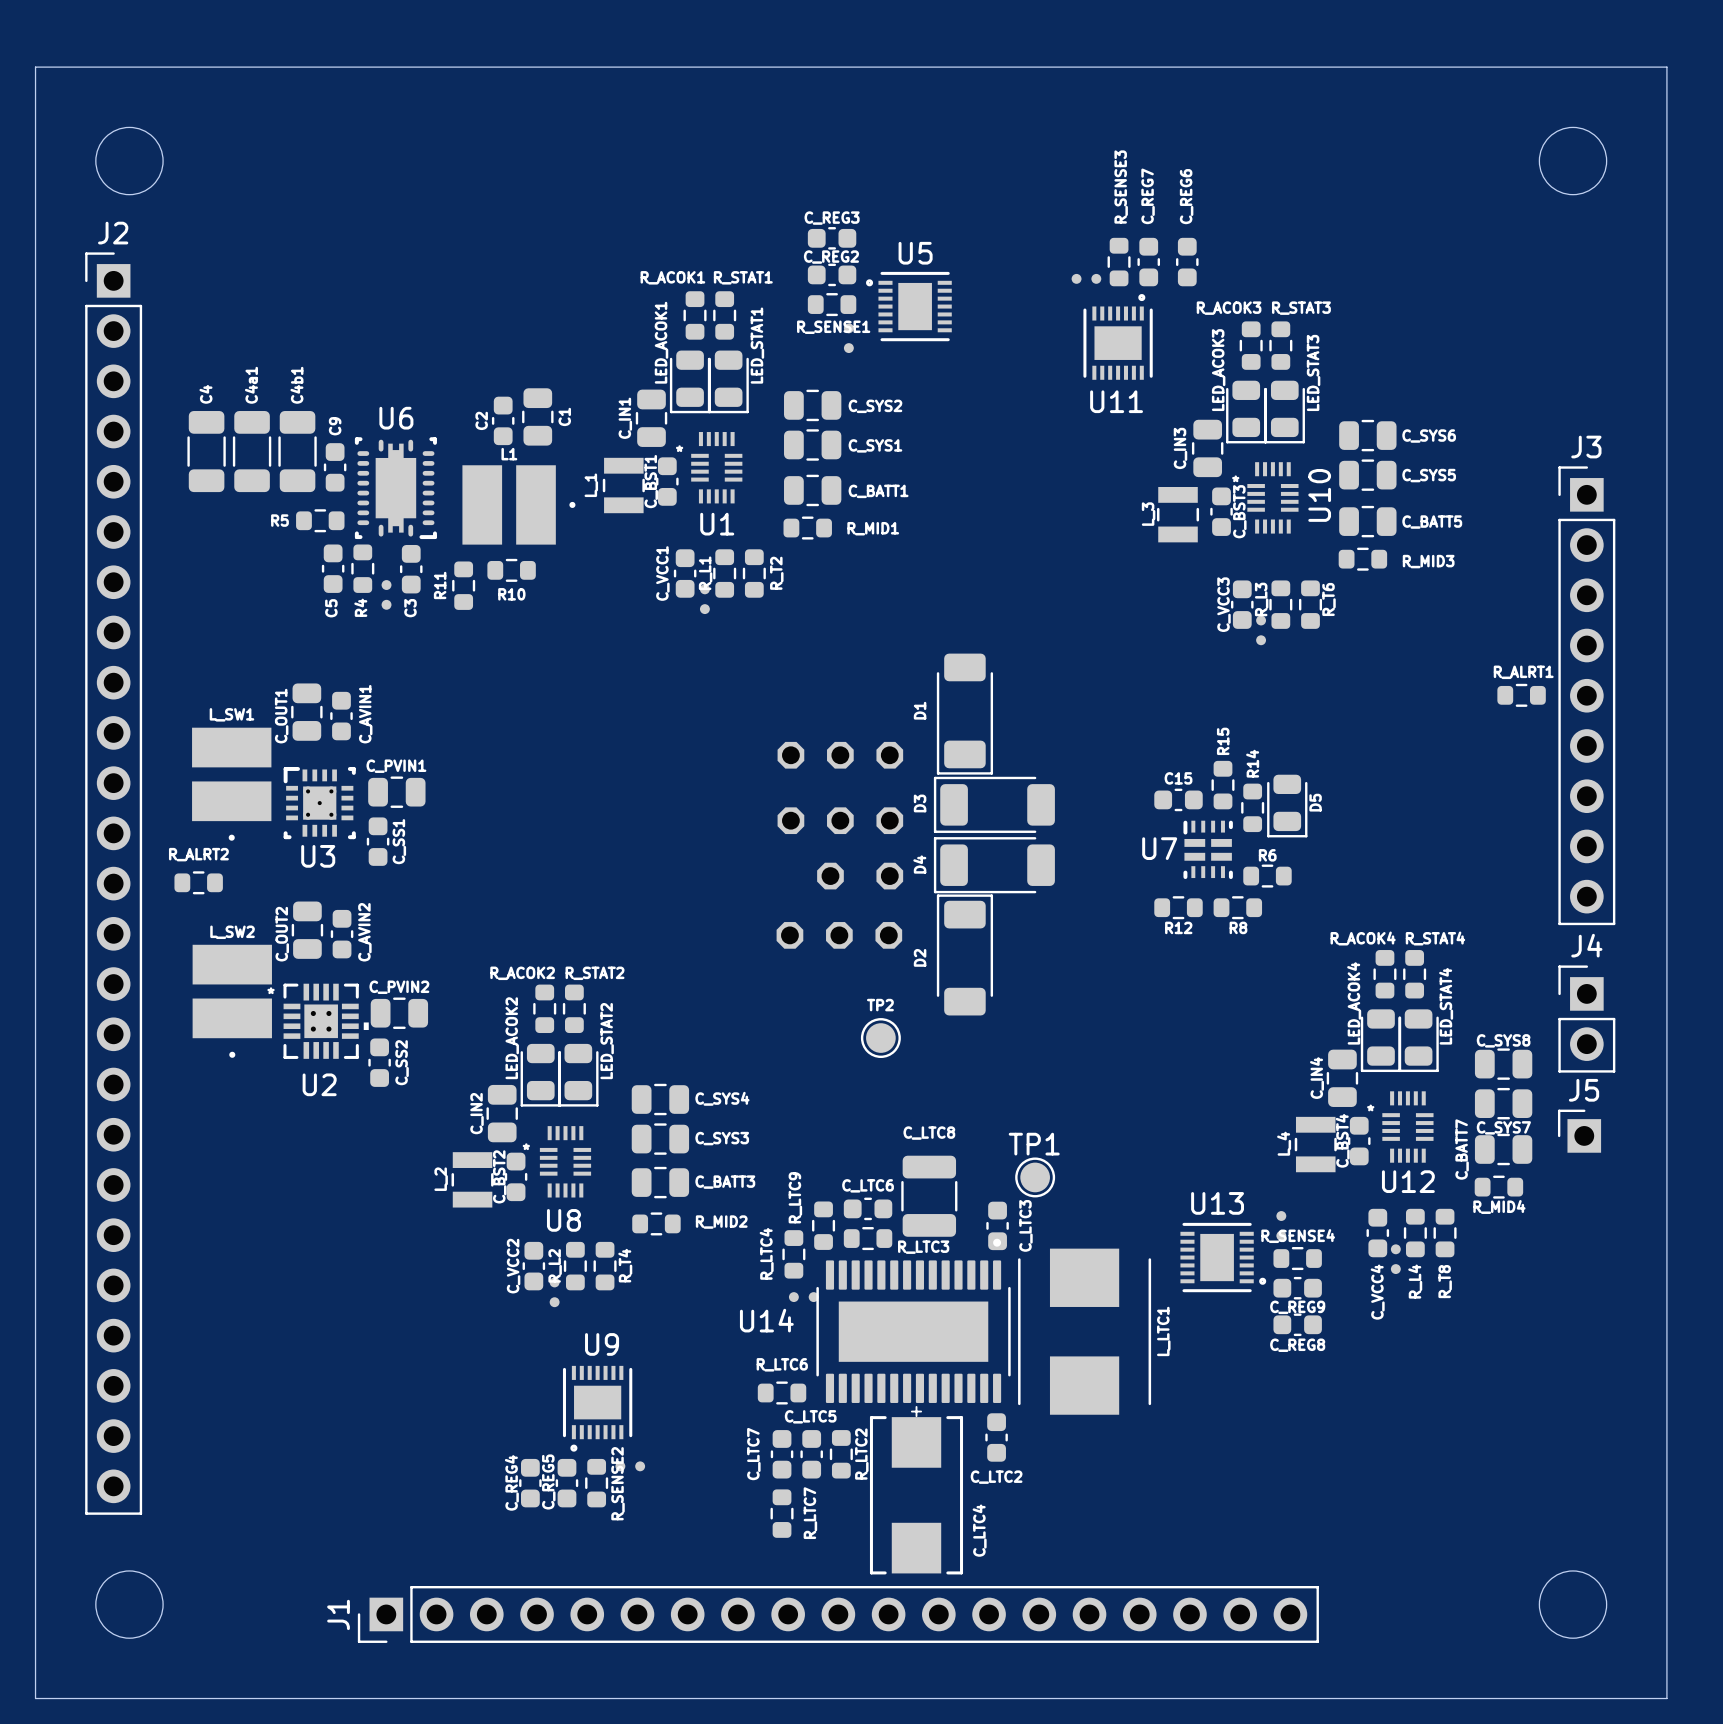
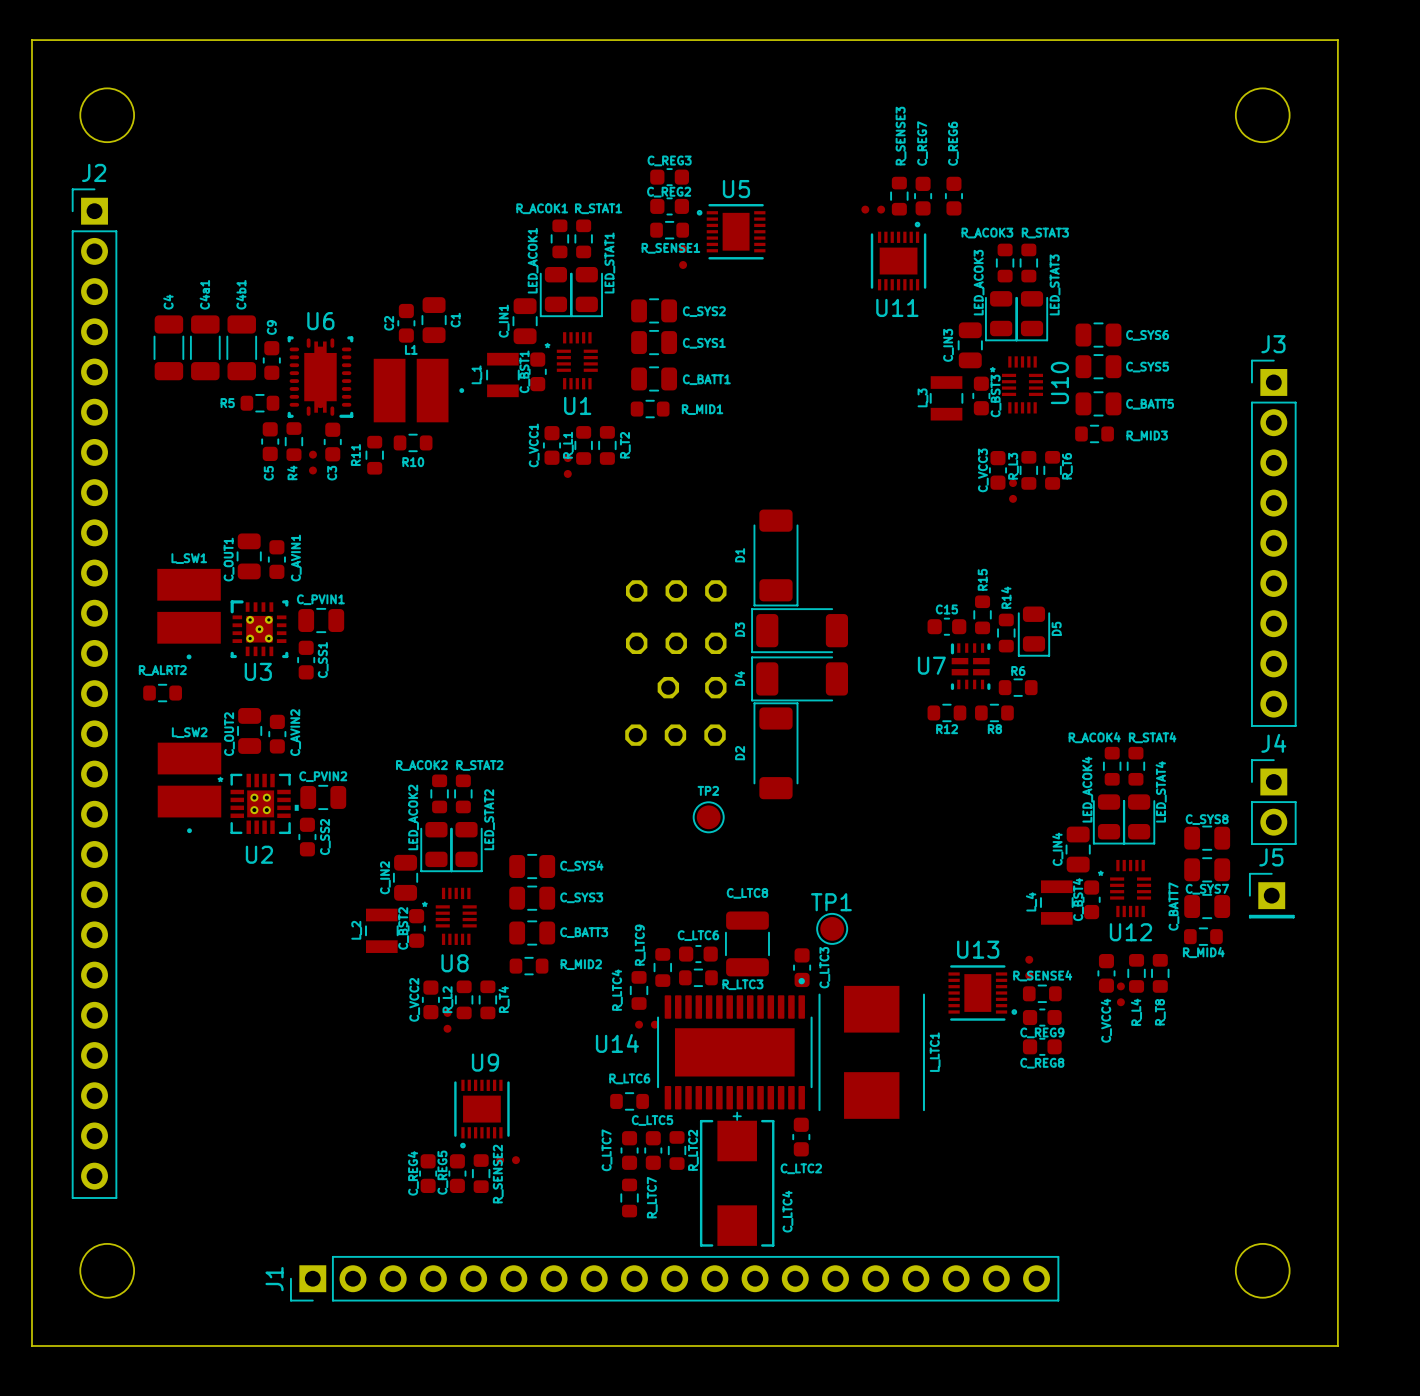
R_ALRT1: (1521, 695) -> none
J5 footprint: [1557, 1109, 1602, 1153] -> [1248, 872, 1295, 919]

